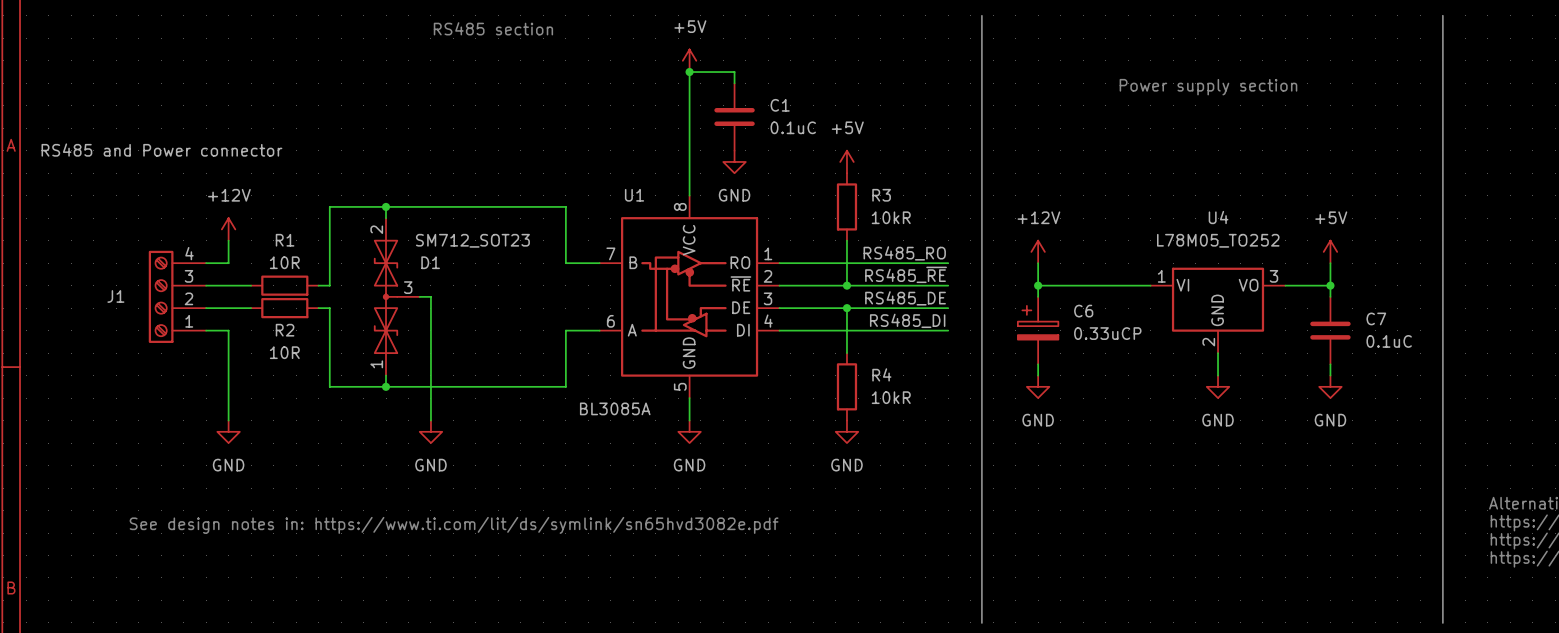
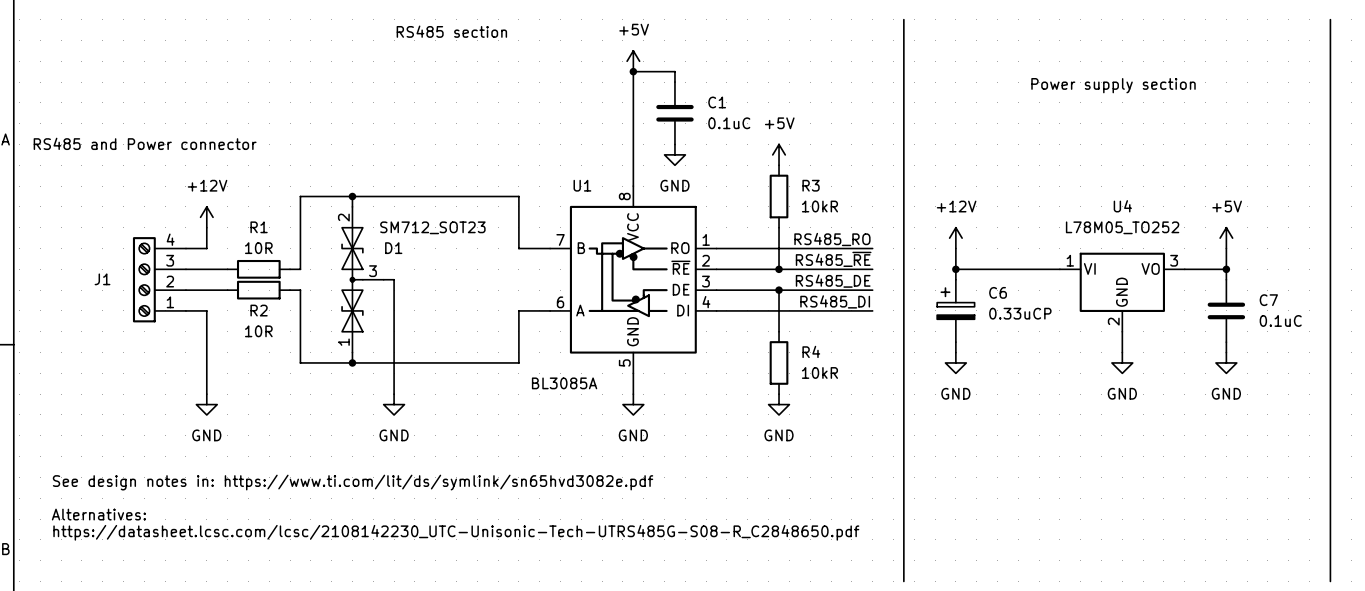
text position: See design notes in: https://www.ti.com/lit/ds/symlink/sn65hvd3082e.pdf (454, 525) -> See design notes in: https://www.ti.com/lit/ds/symlink/sn65hvd3082e.pdf (353, 482)
text: none -> Alternatives: (98, 514)
text: none -> https://datasheet.lcsc.com/lcsc/2108142230_UTC-Unisonic-Tech-UTRS485G-S08-R_C2848650.pdf (456, 532)

